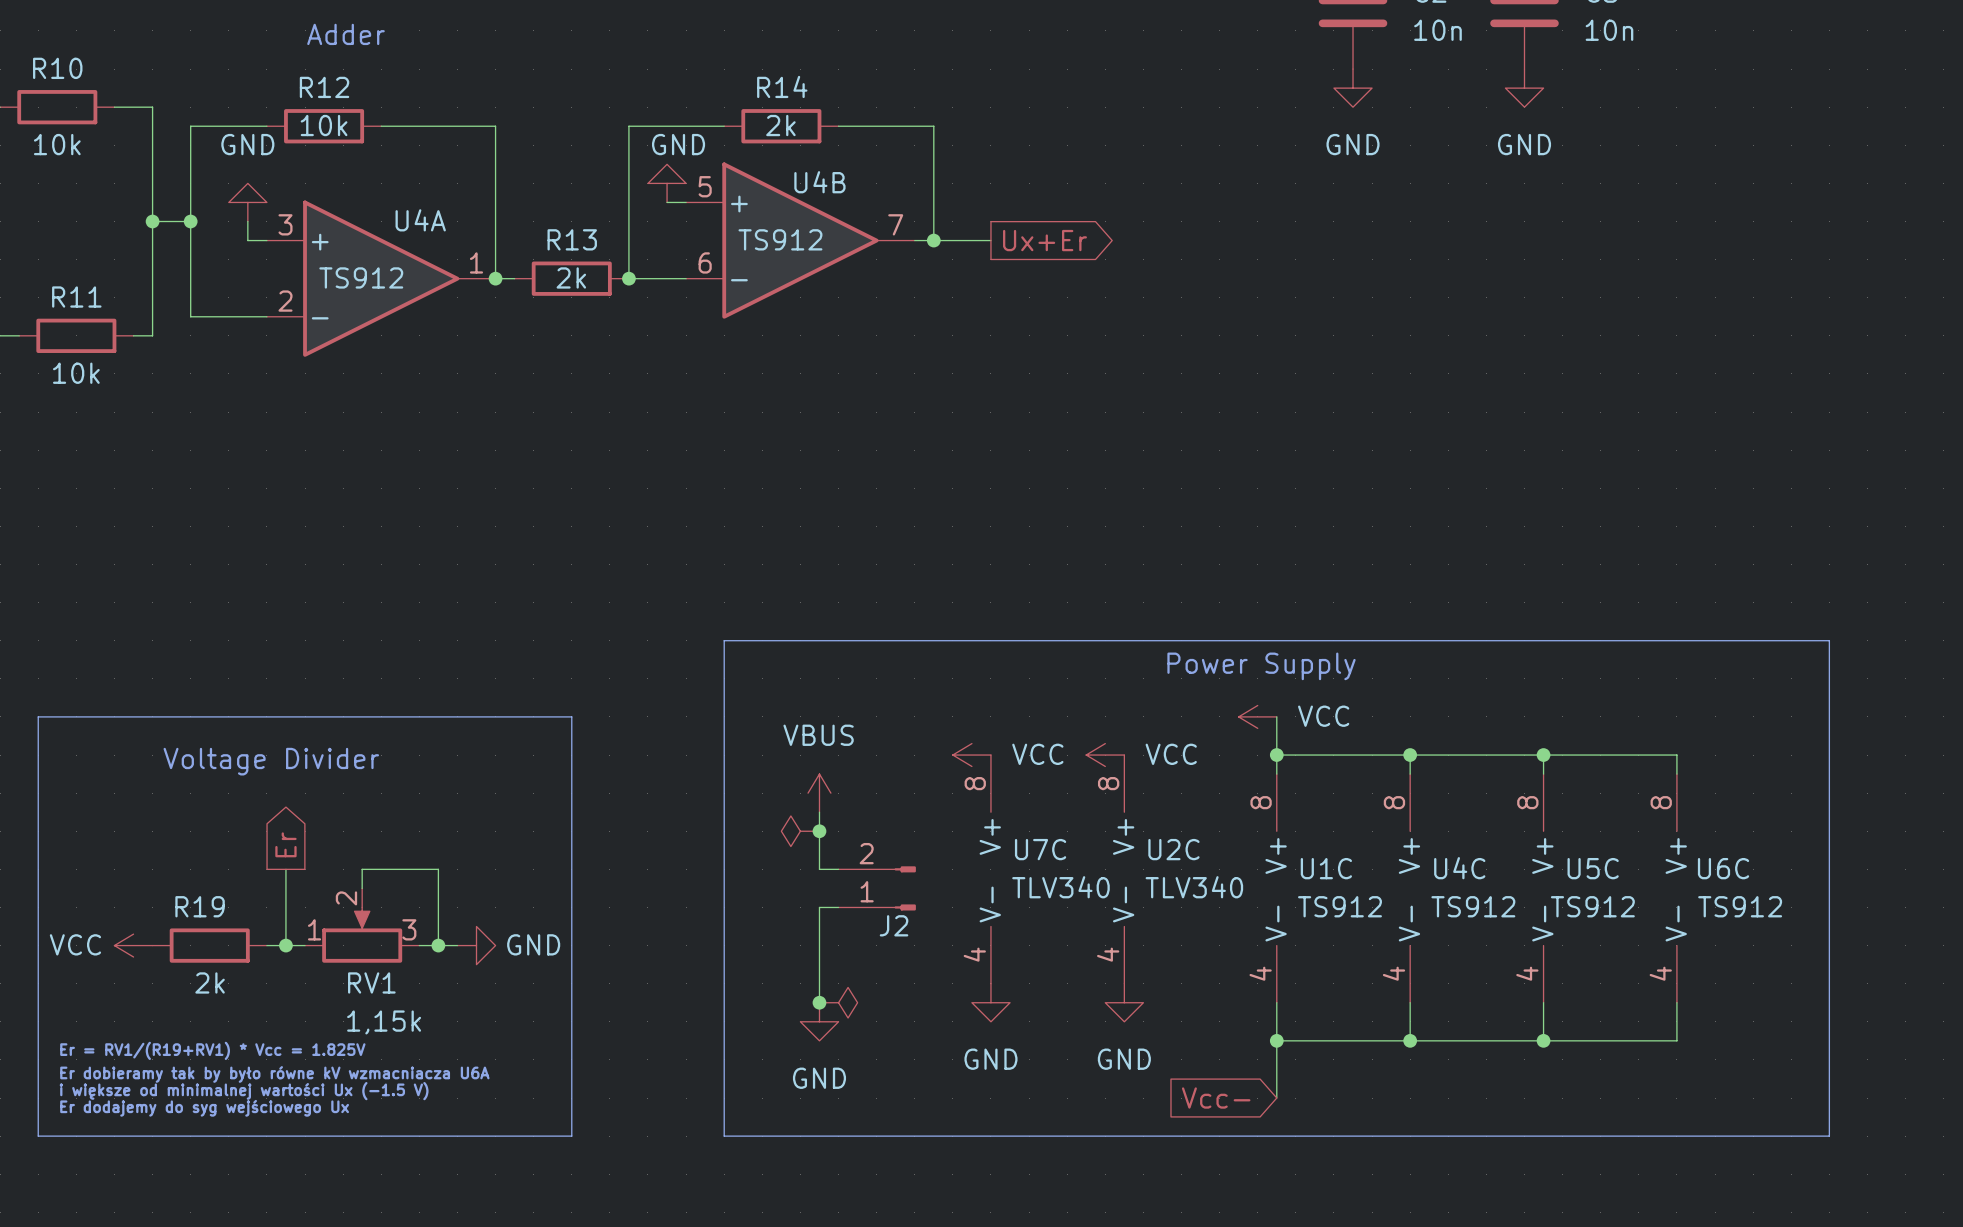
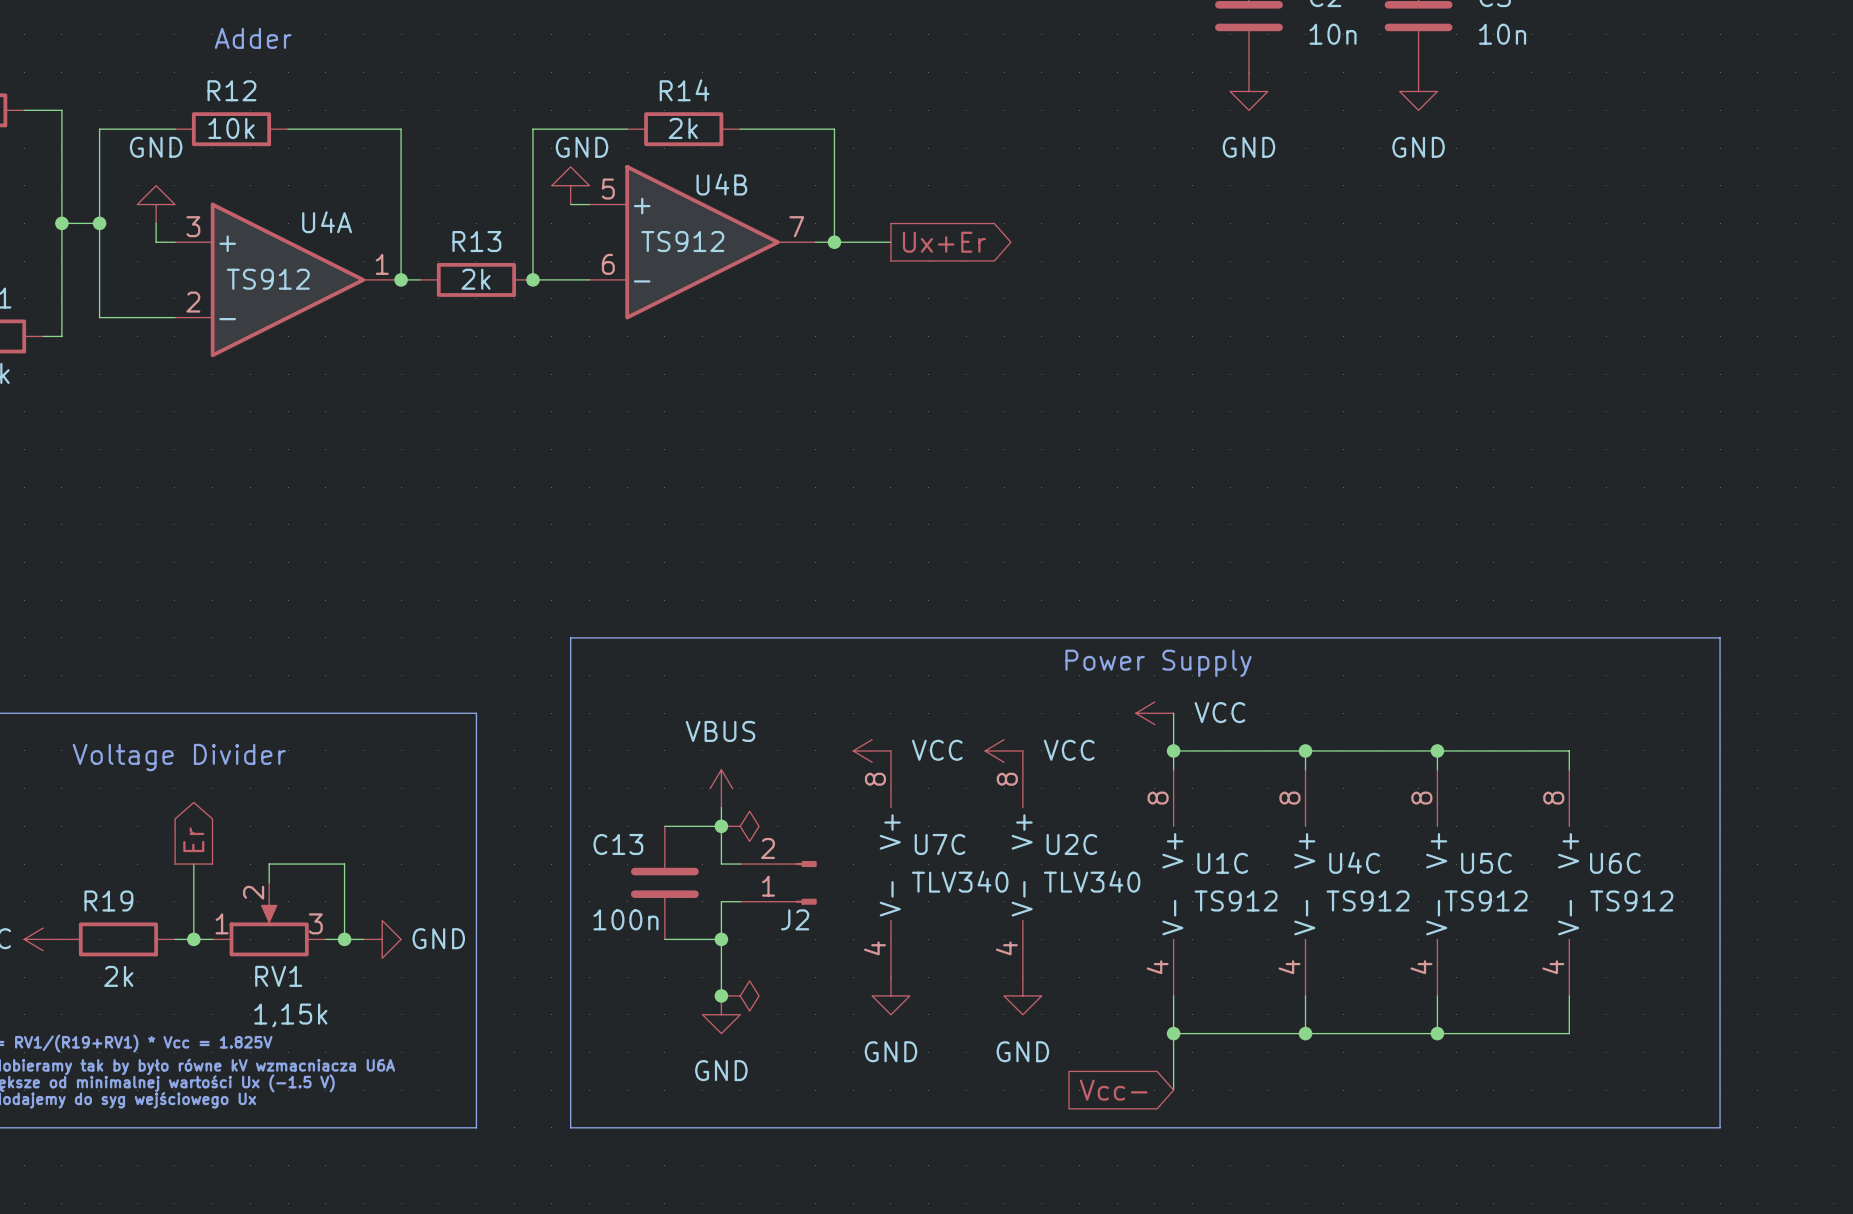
line: (724, 640) (724, 1136) -> (627, 637) (570, 637) (570, 1127) (627, 1127)
wire: none -> (664, 826) (721, 826)
power symbol rotation: 0° (800, 831) -> 180° (740, 826)
power symbol position: (800, 831) -> (740, 826)
C13: none -> 100n (664, 882)
wire: none -> (664, 939) (721, 939)
junction: none -> (721, 939)

